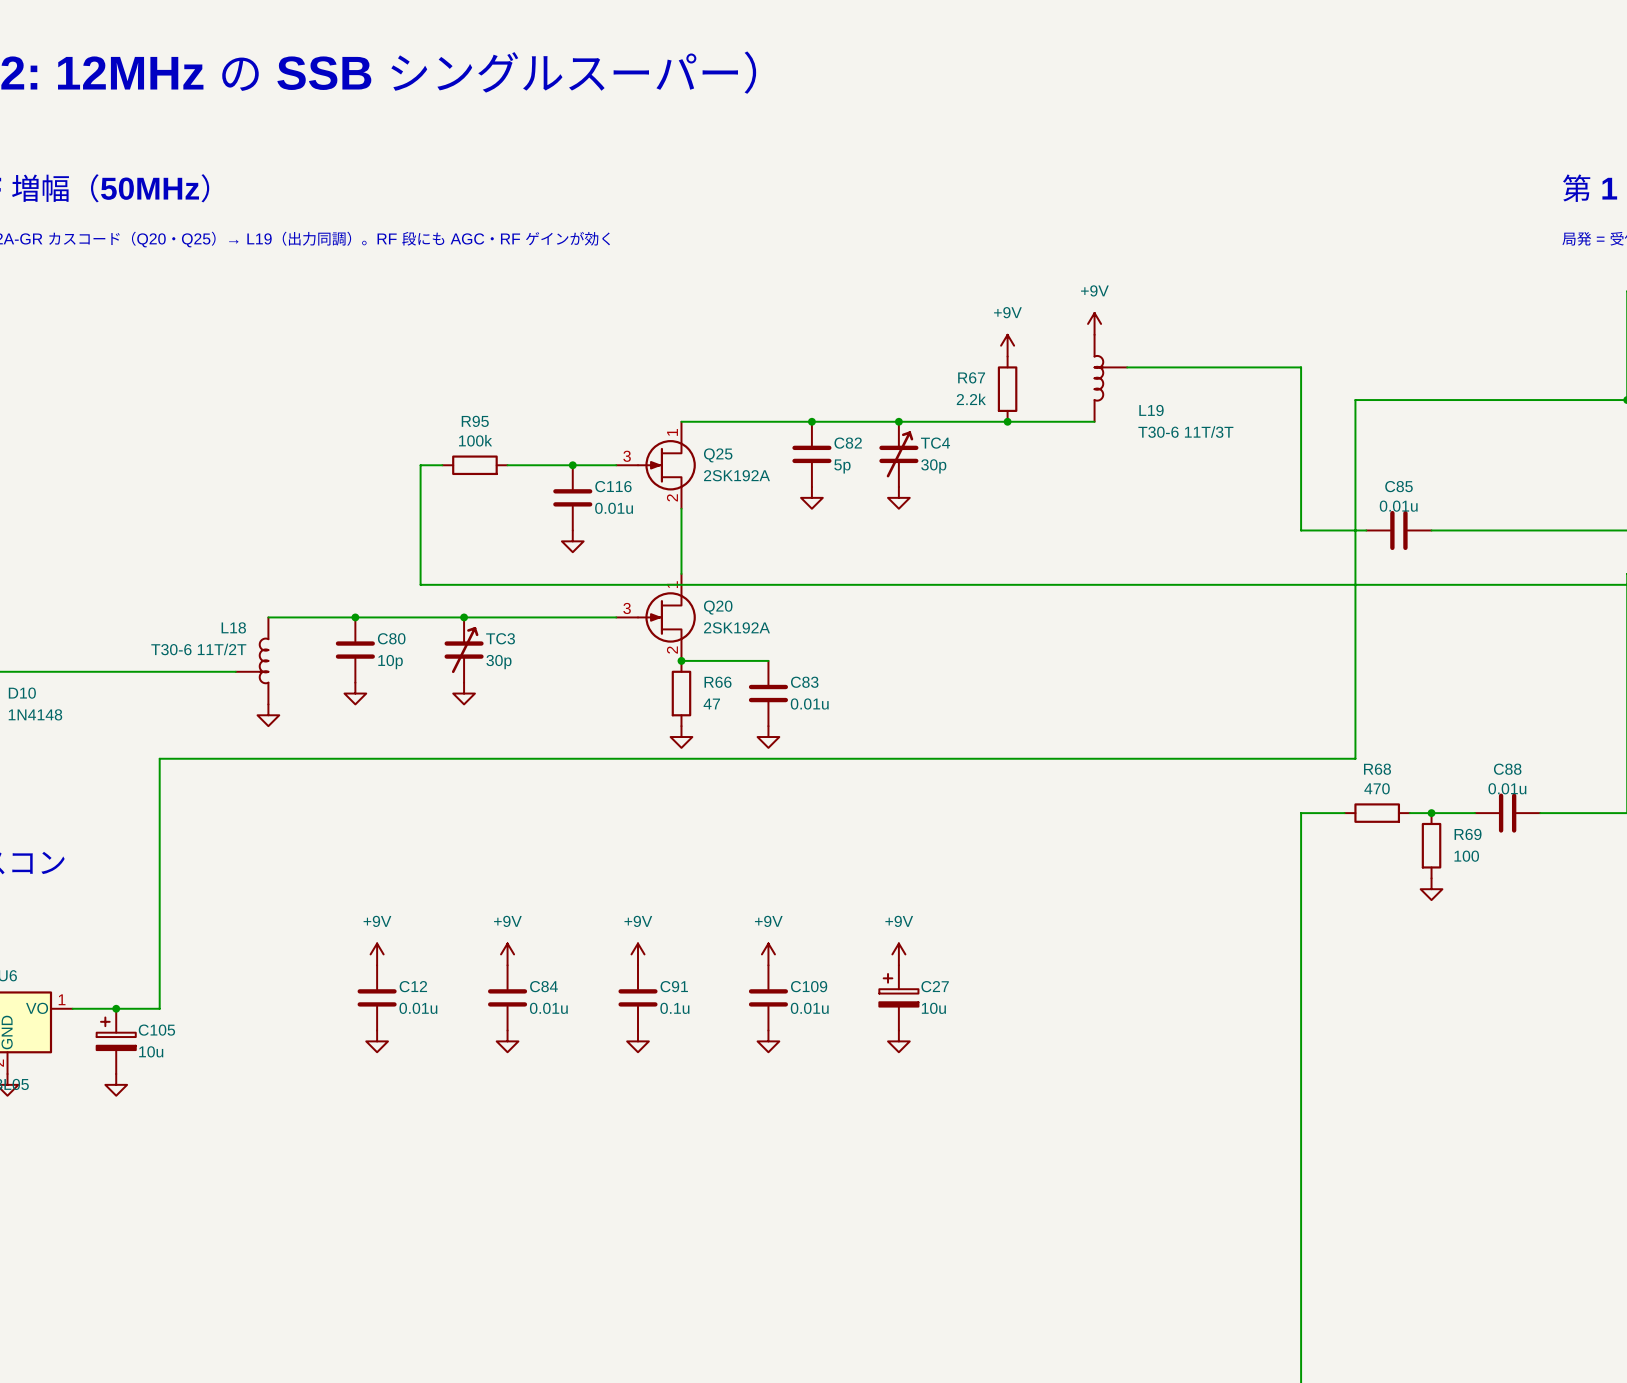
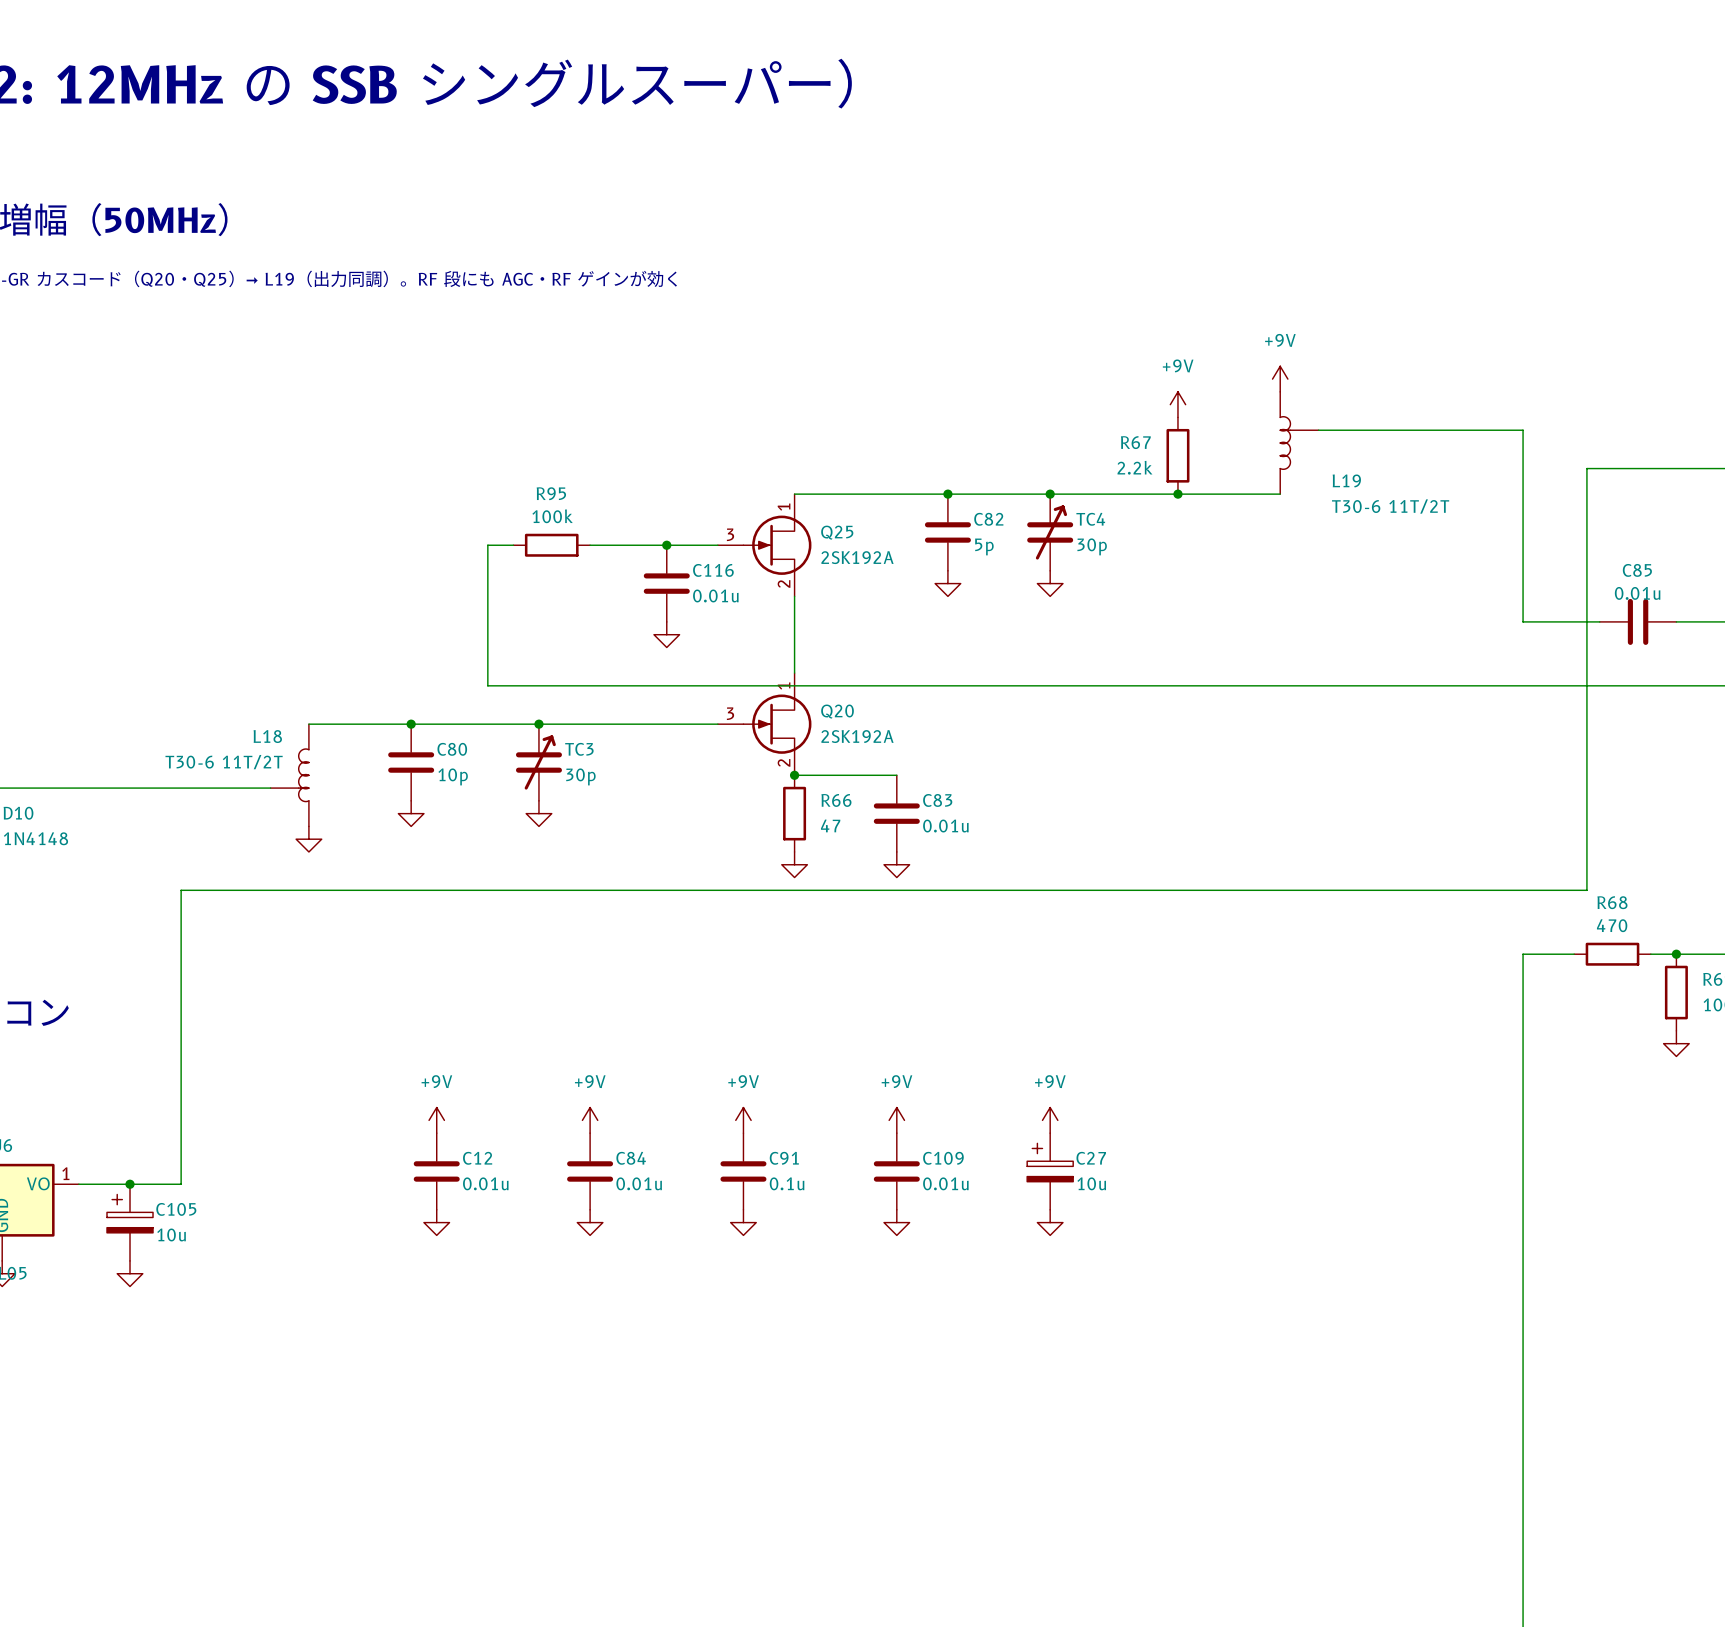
L19 value: T30-6 11T/3T (1185, 432) -> T30-6 11T/2T (1390, 506)

